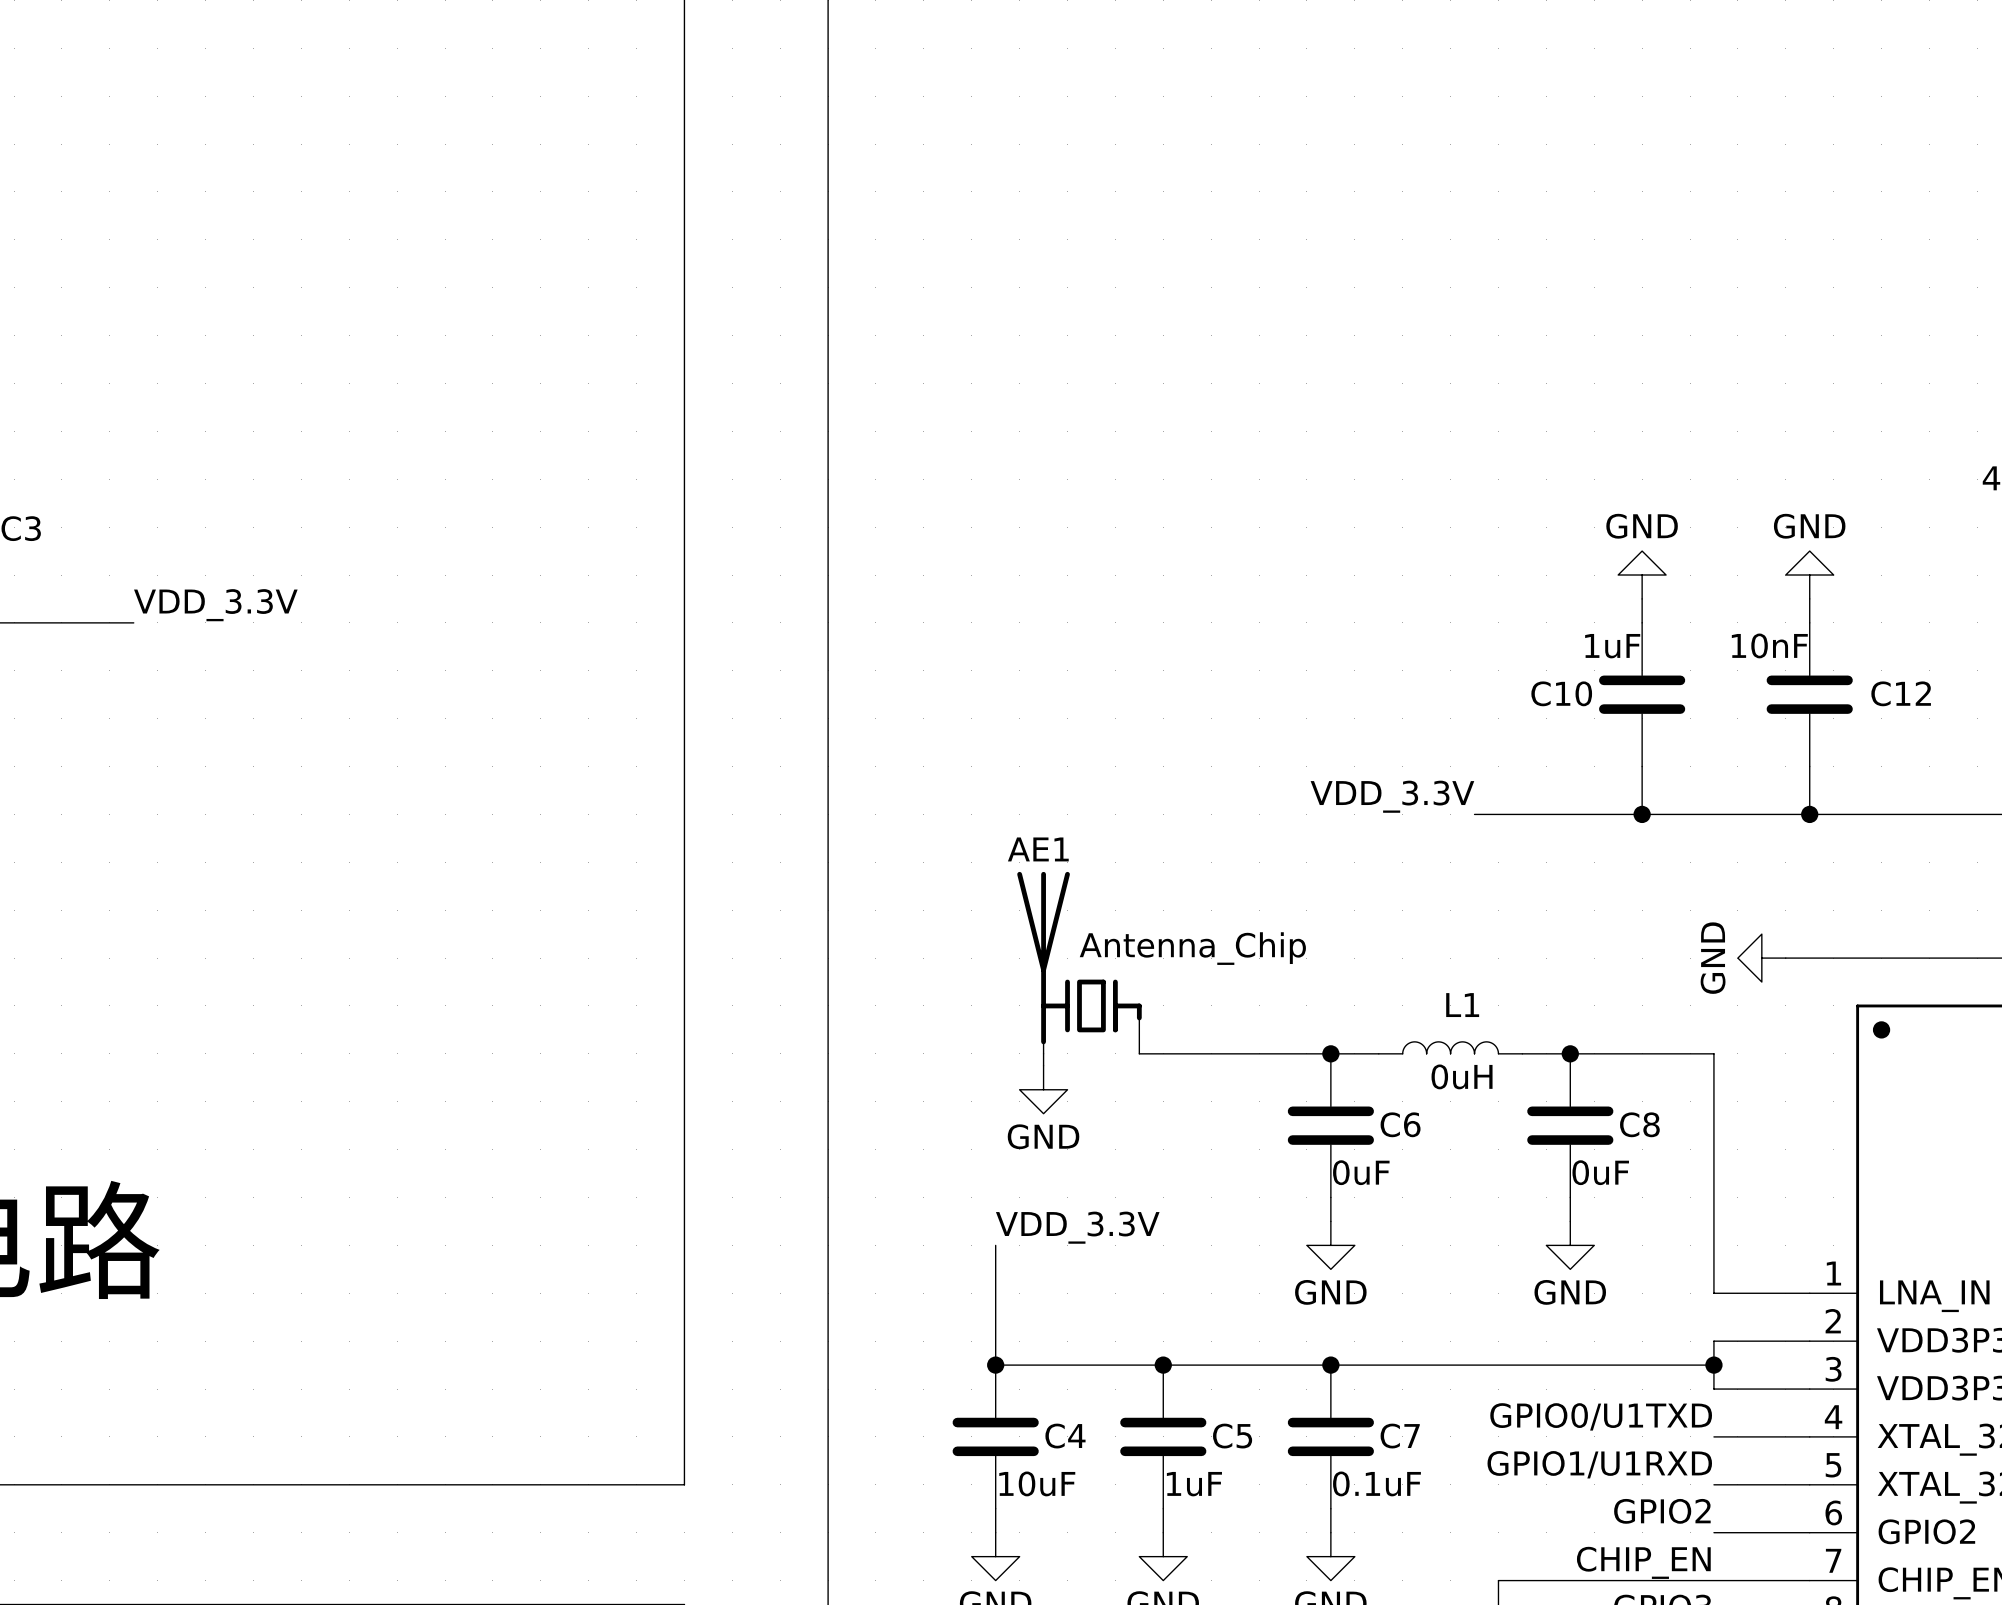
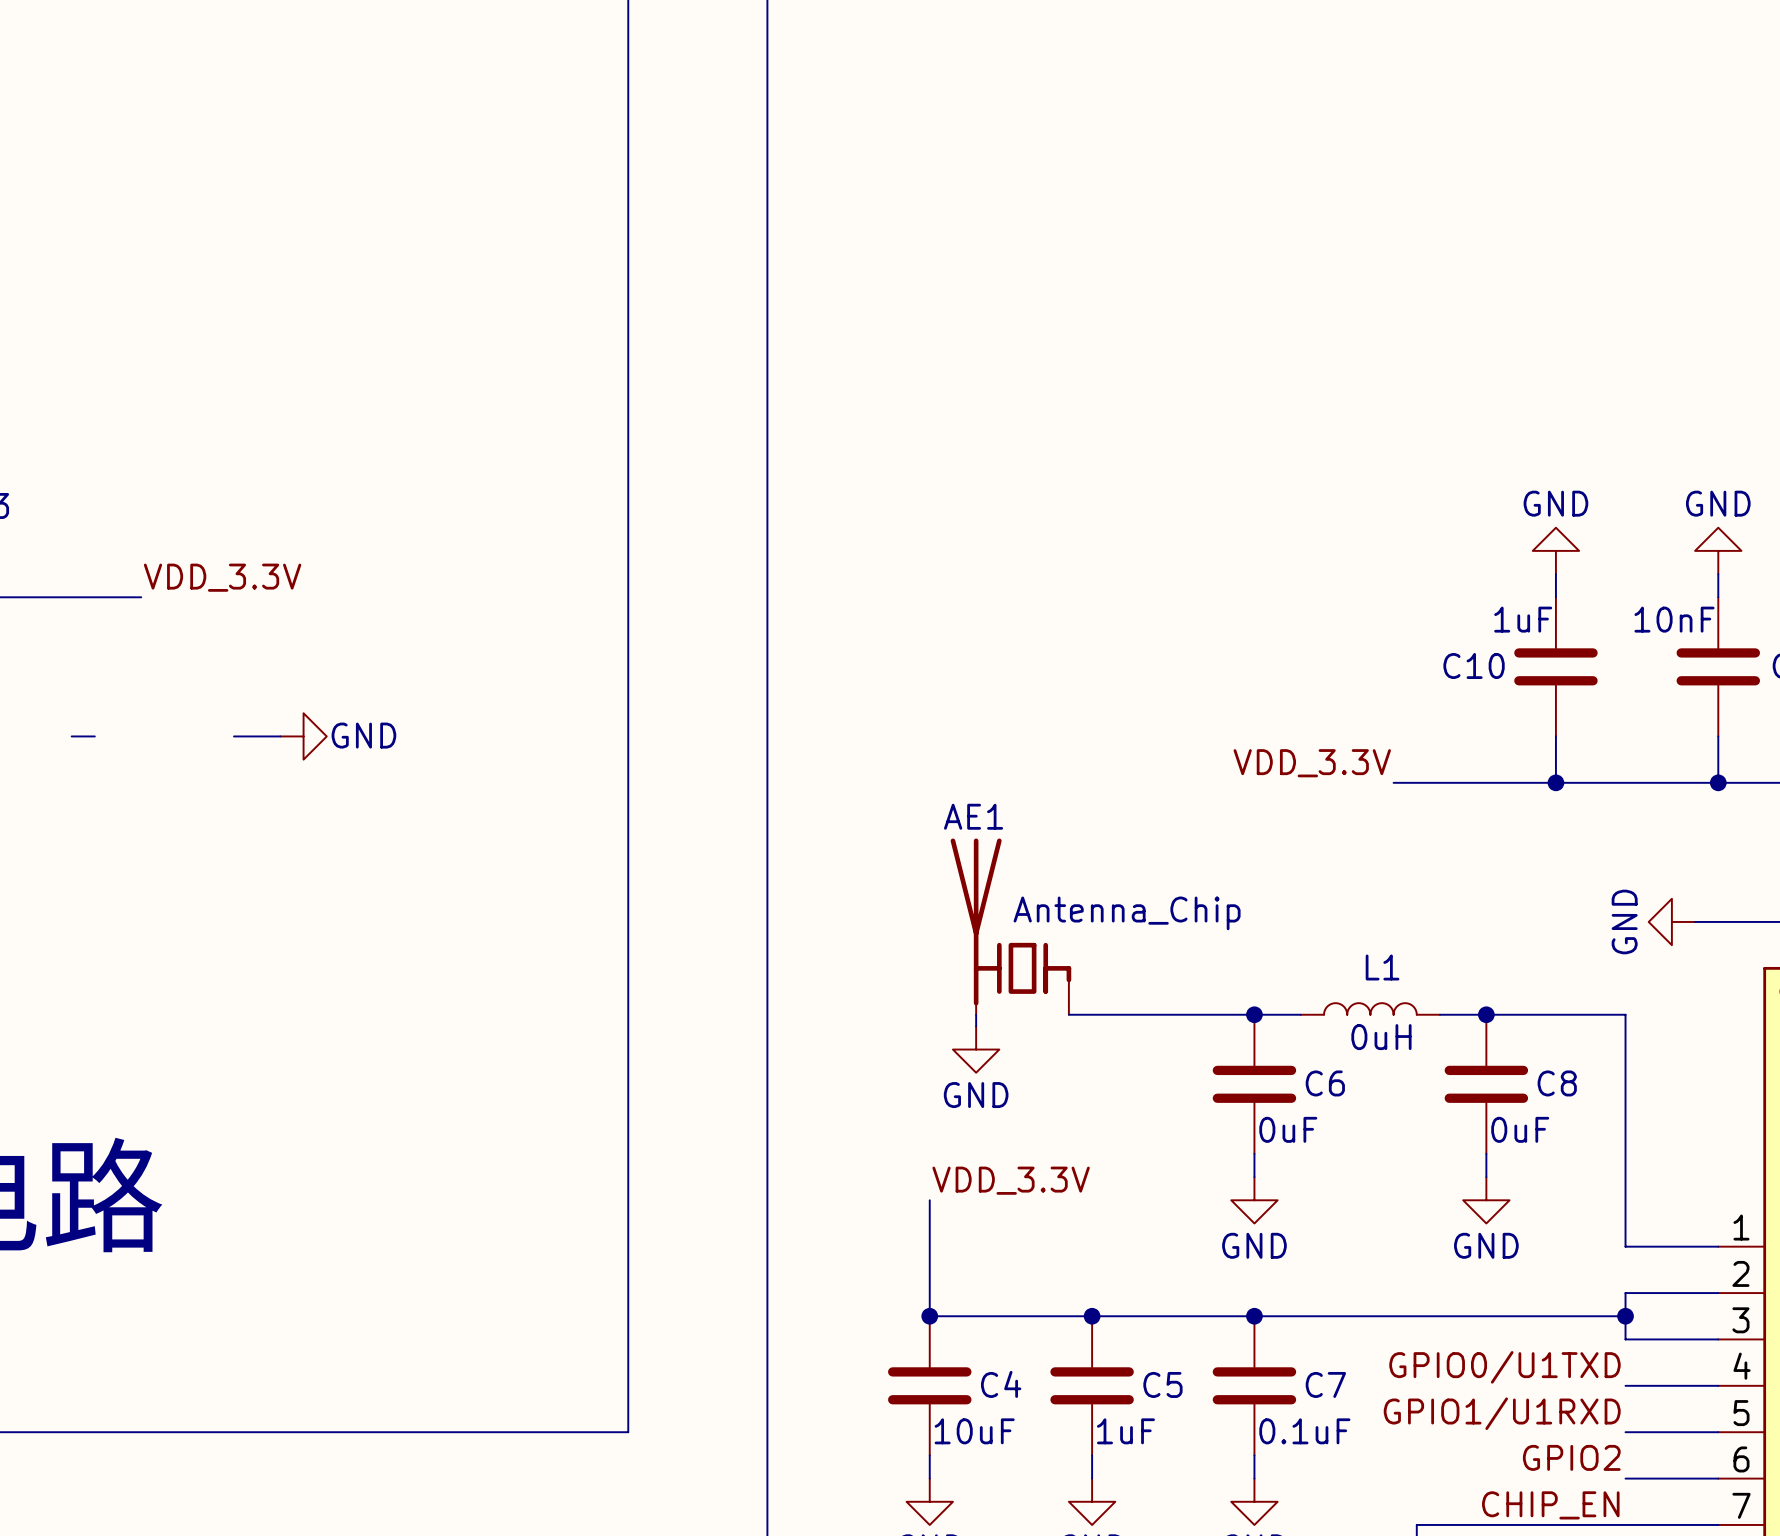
label position: VDD_3.3V (215, 605) -> VDD_3.3V (222, 577)
wire: none -> (94, 597) (141, 597)
wire: none -> (71, 736) (94, 736)
wire: none -> (233, 736) (280, 736)
power symbol: none -> GND (303, 736)

